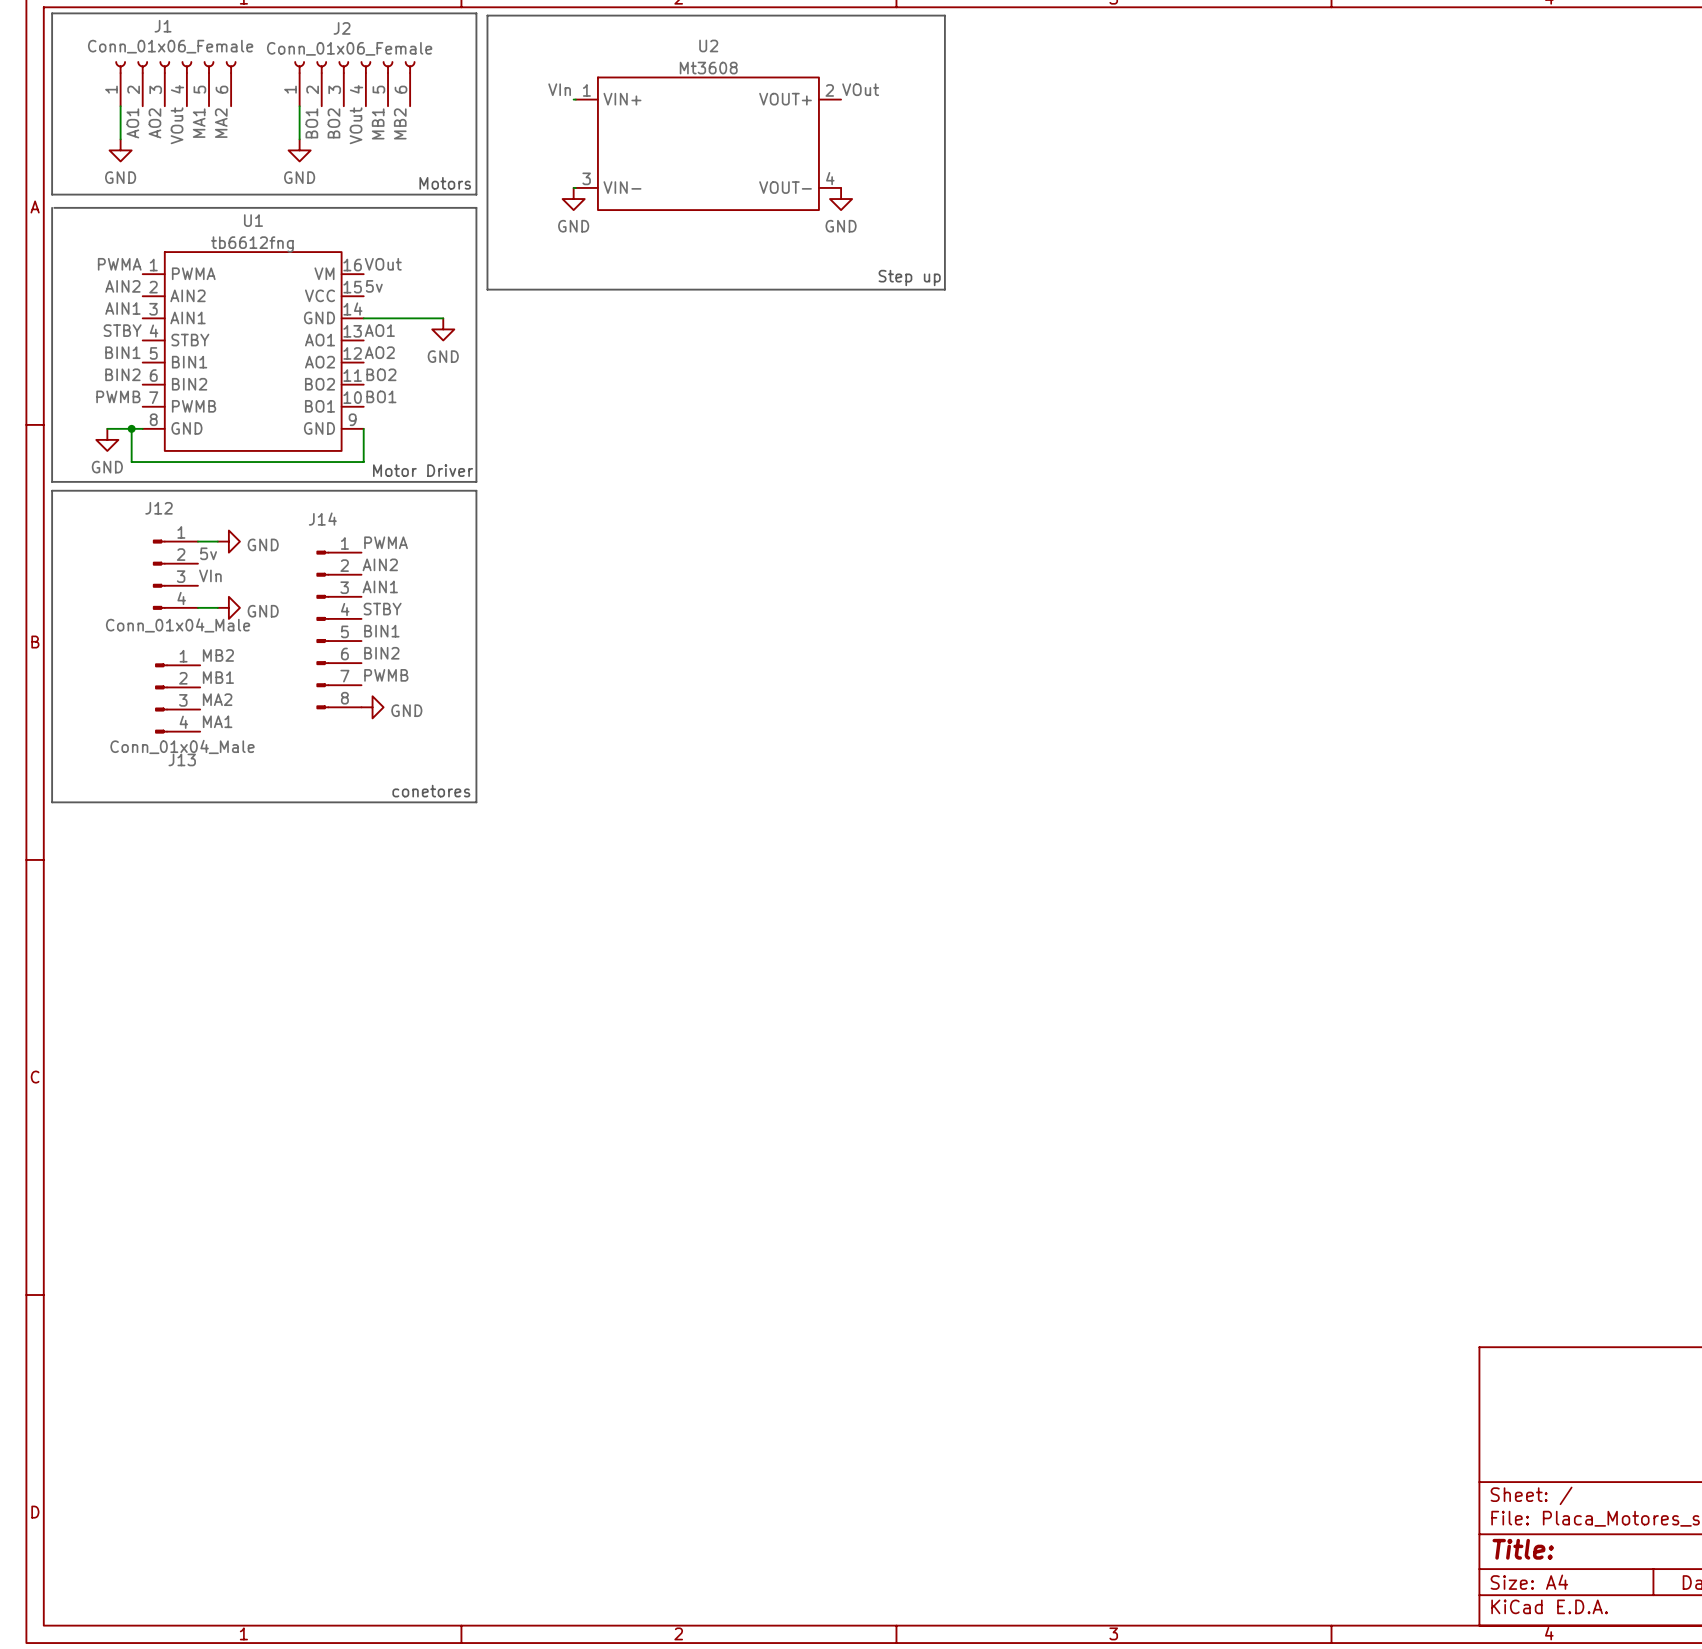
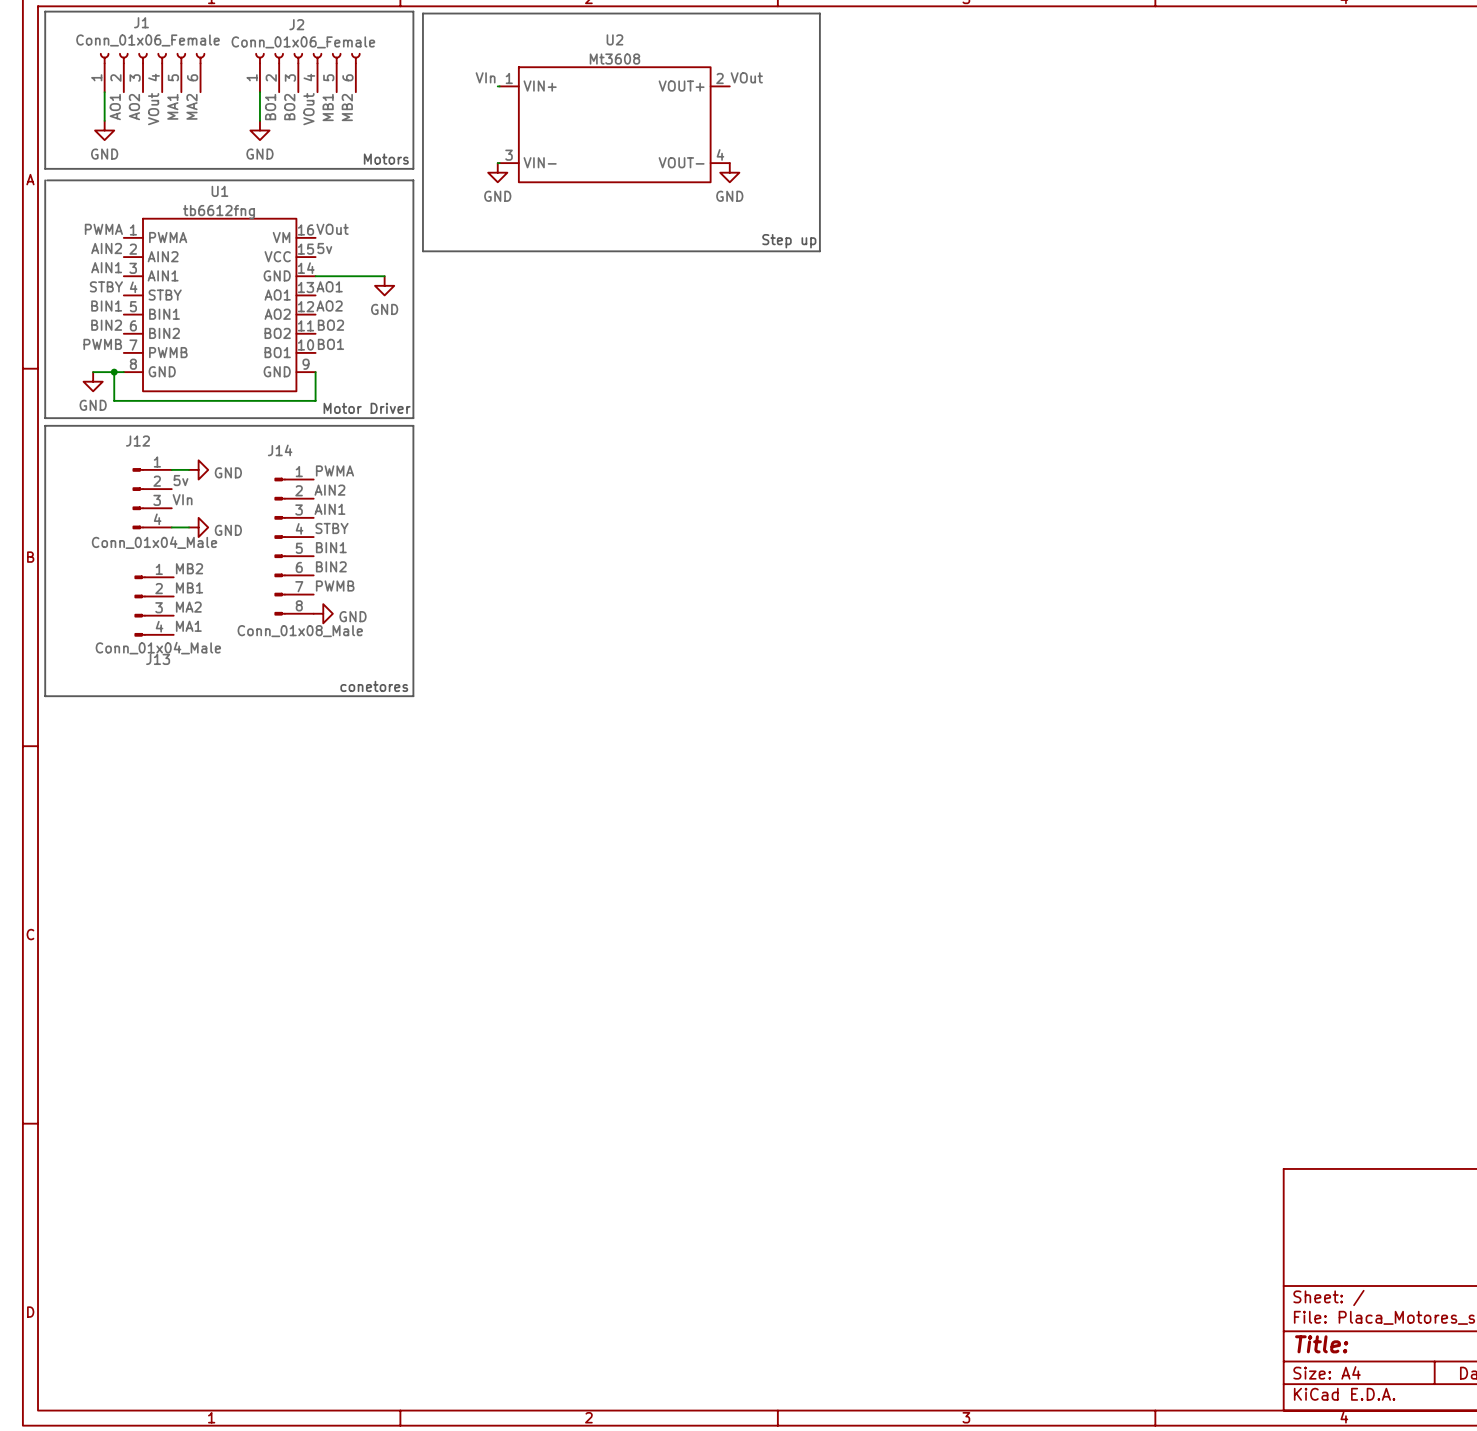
J14 value: none -> Conn_01x08_Male (300, 631)

